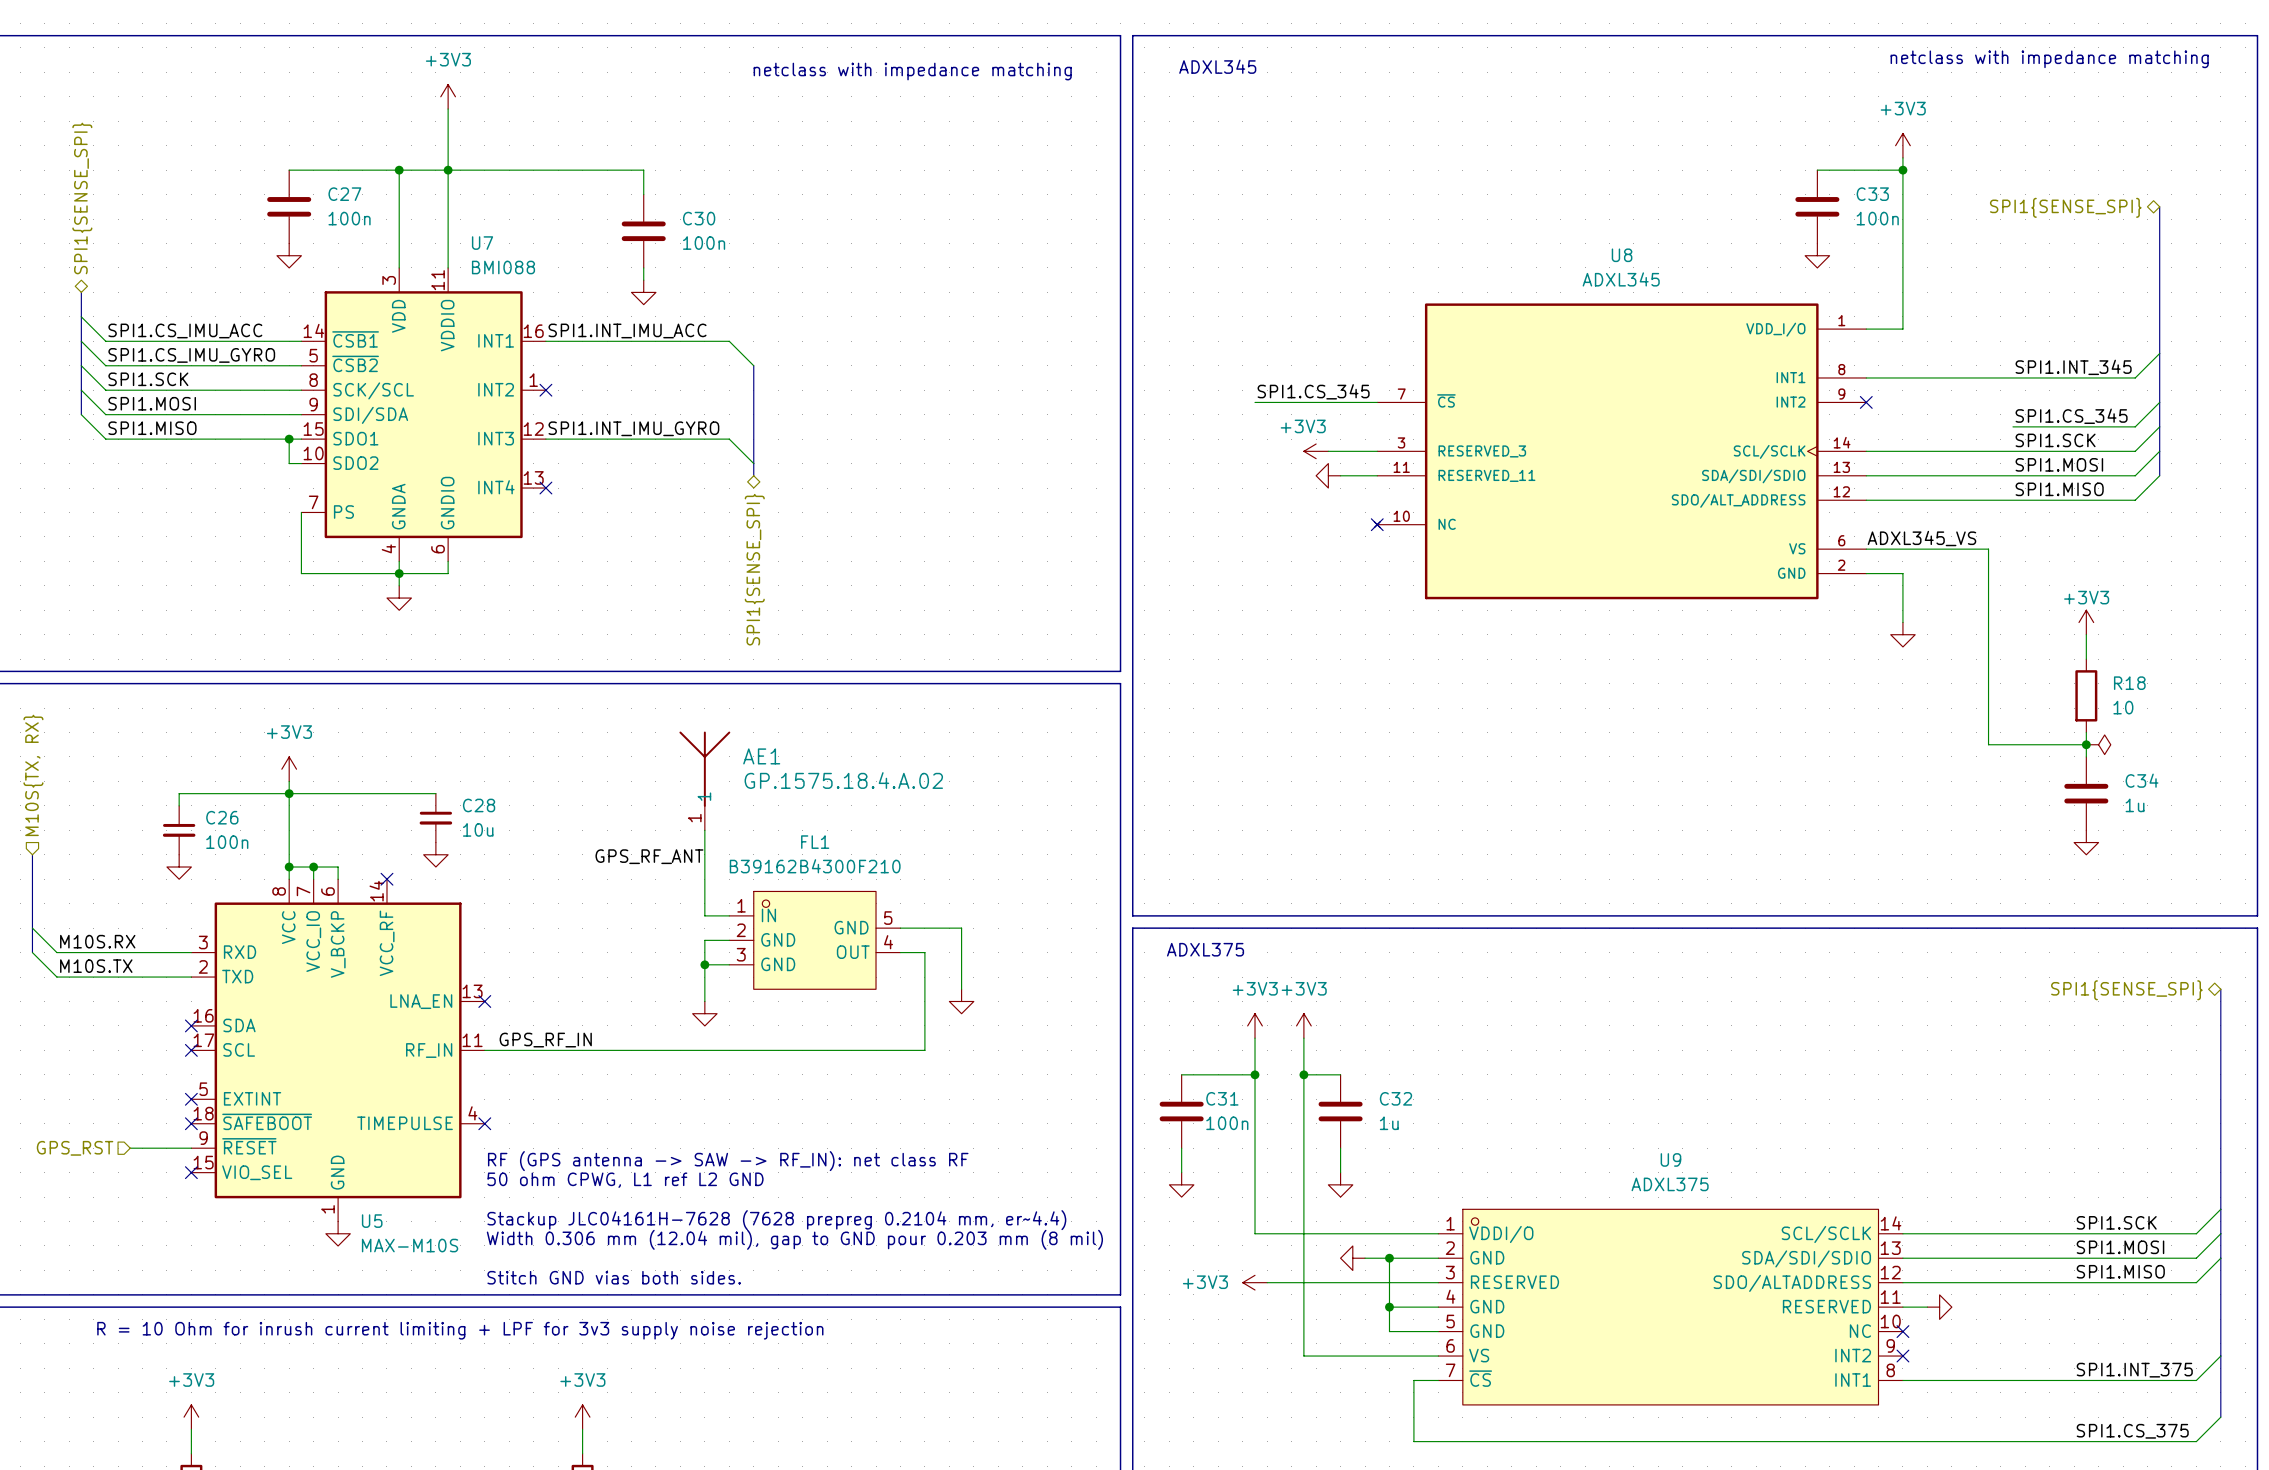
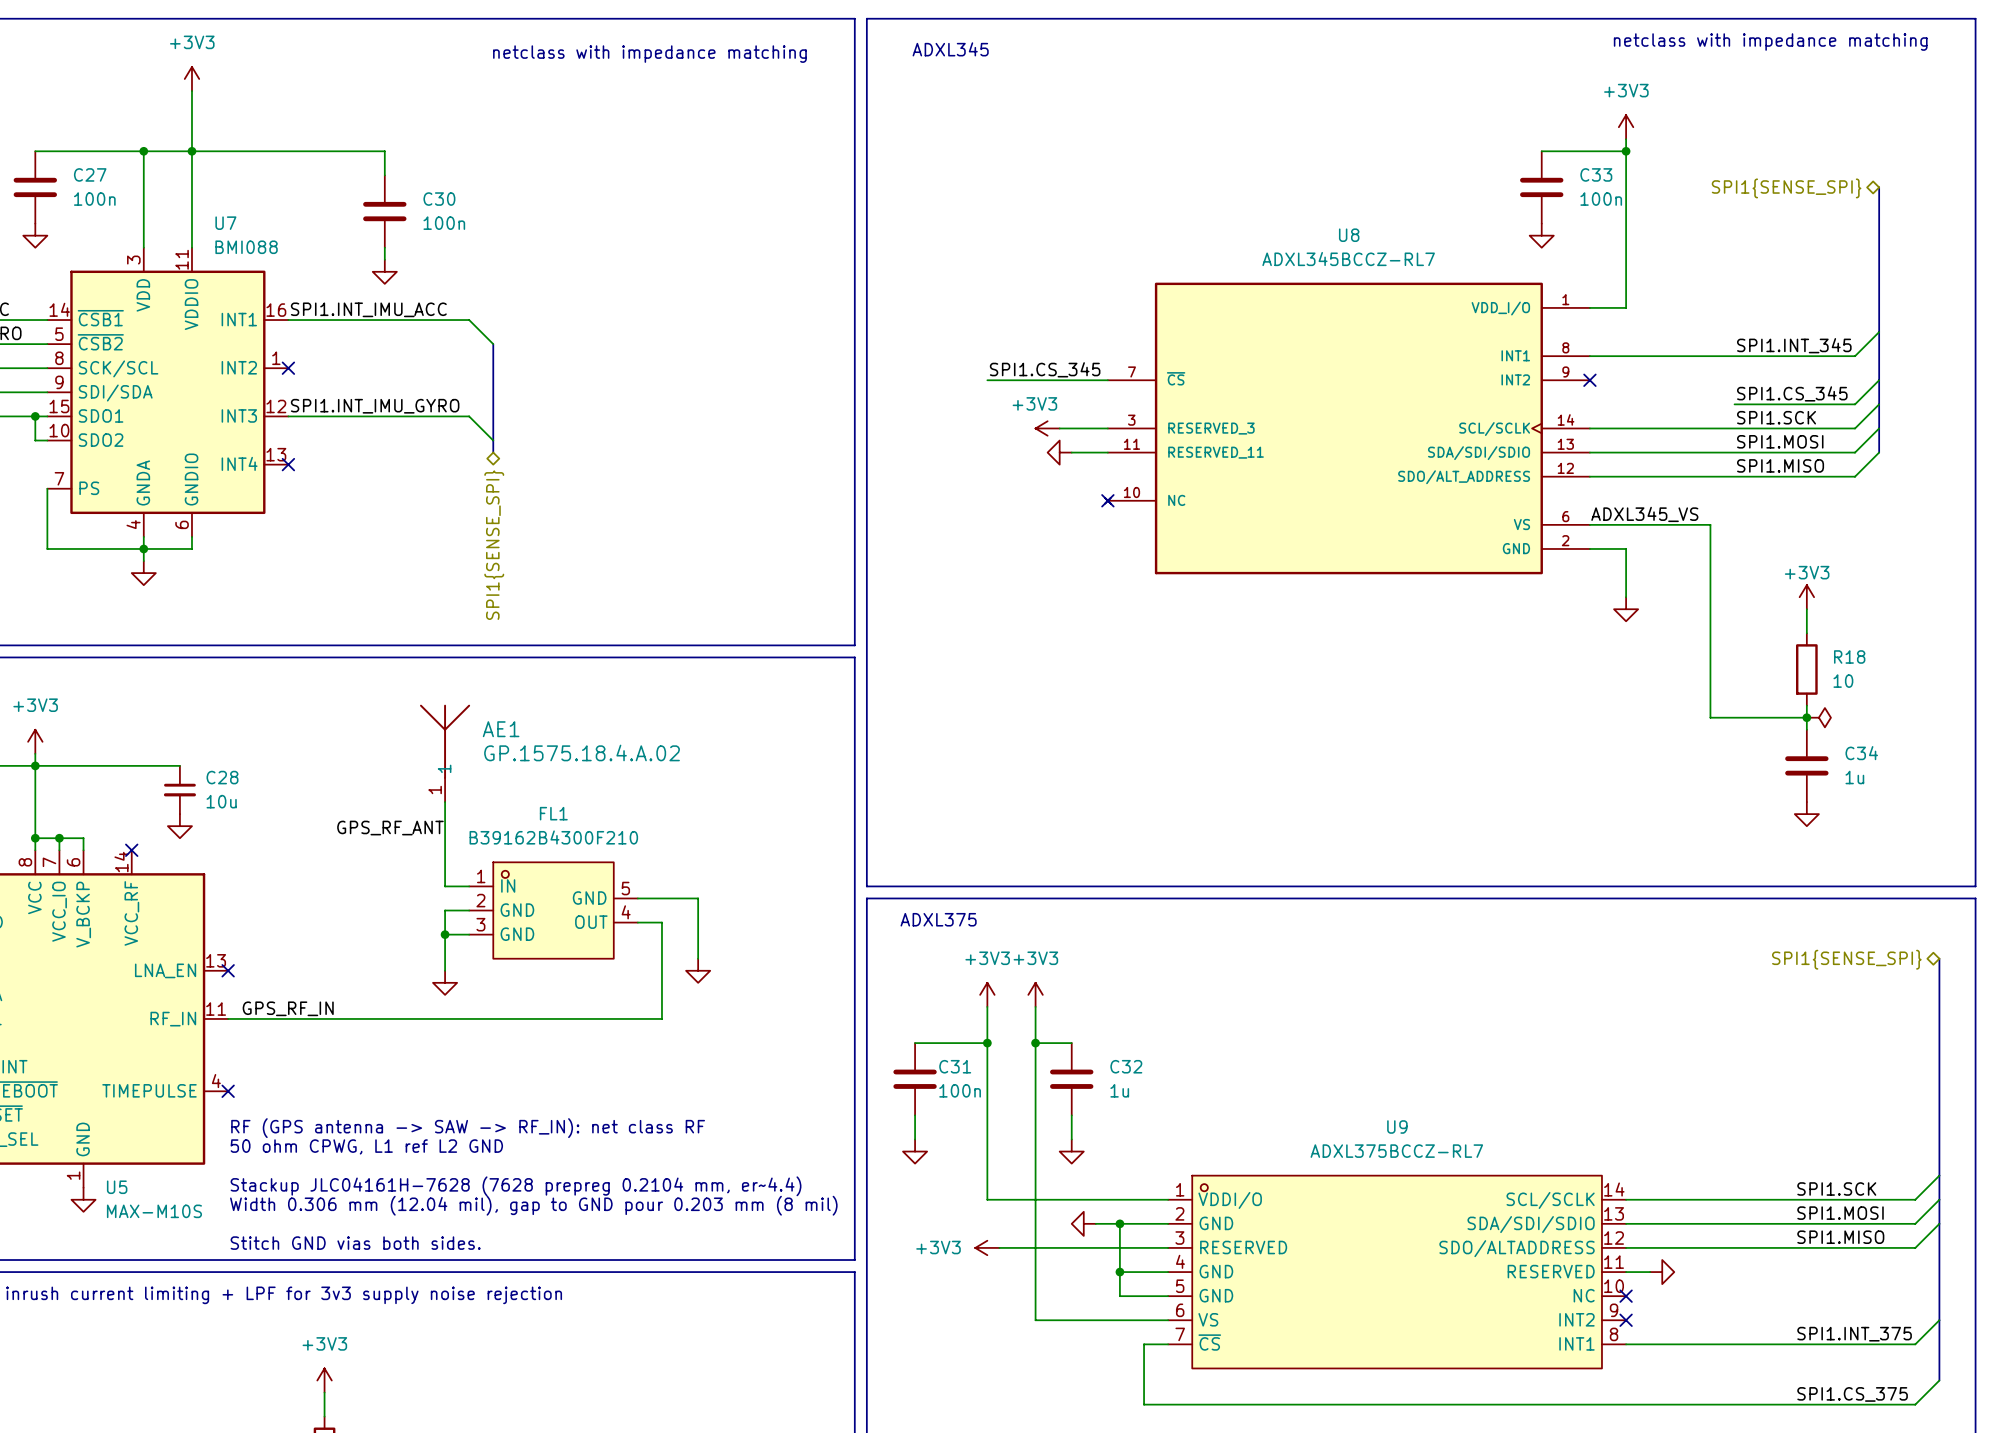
U8 value: ADXL345 (1621, 279) -> ADXL345BCCZ-RL7 (1348, 259)
U9 value: ADXL375 (1670, 1184) -> ADXL375BCCZ-RL7 (1396, 1151)

